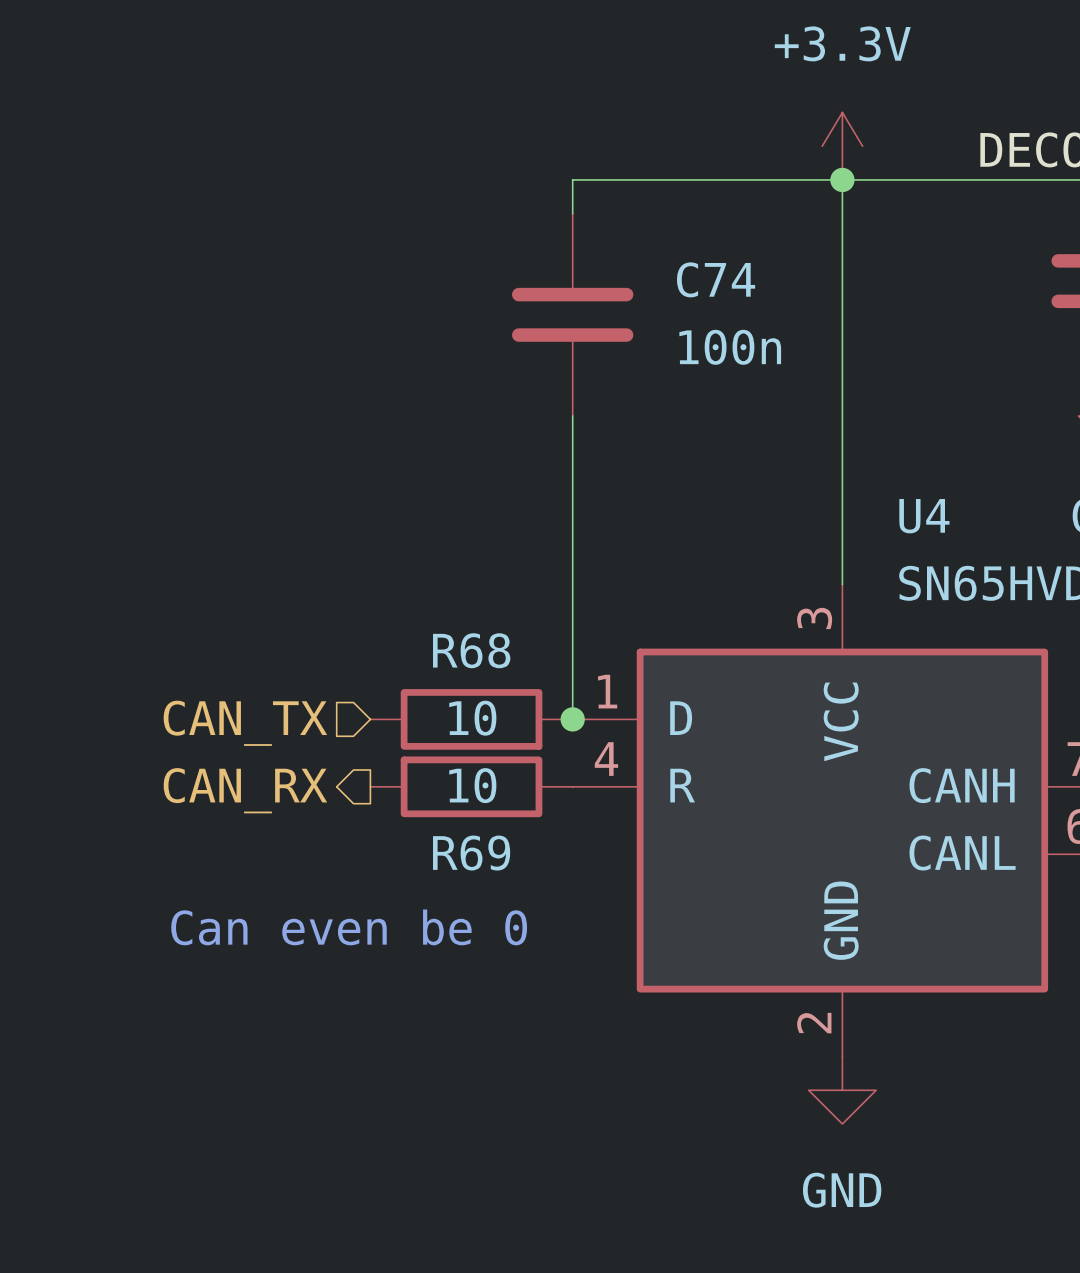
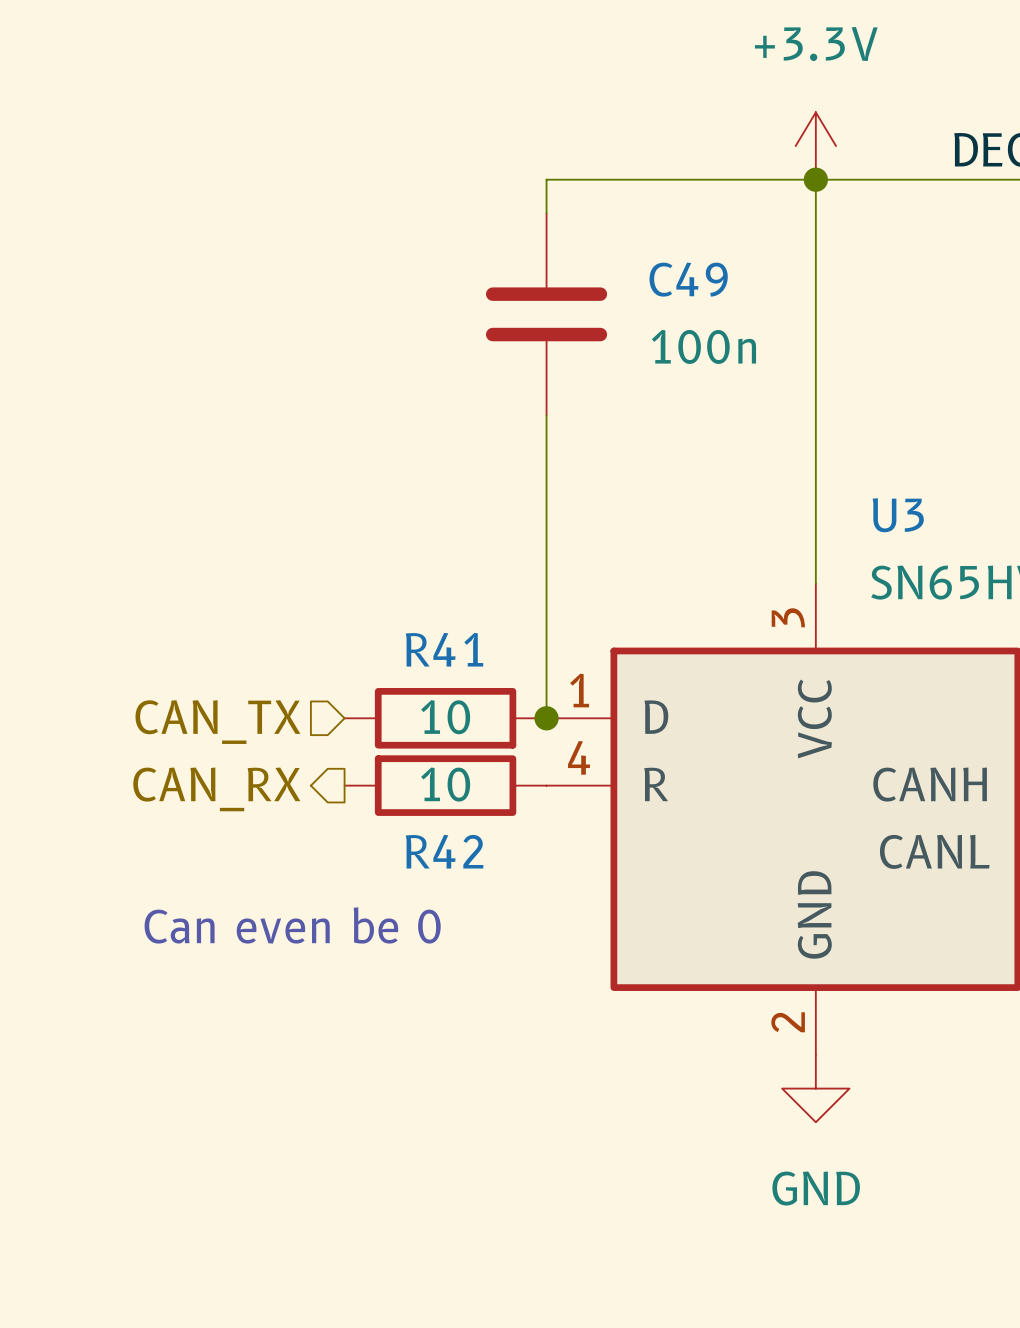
C74 name: C74 (716, 279) -> C49 (688, 279)
U4 name: U4 (924, 516) -> U3 (898, 515)
R68 name: R68 (471, 650) -> R41 (444, 649)
R69 name: R69 (471, 853) -> R42 (444, 851)

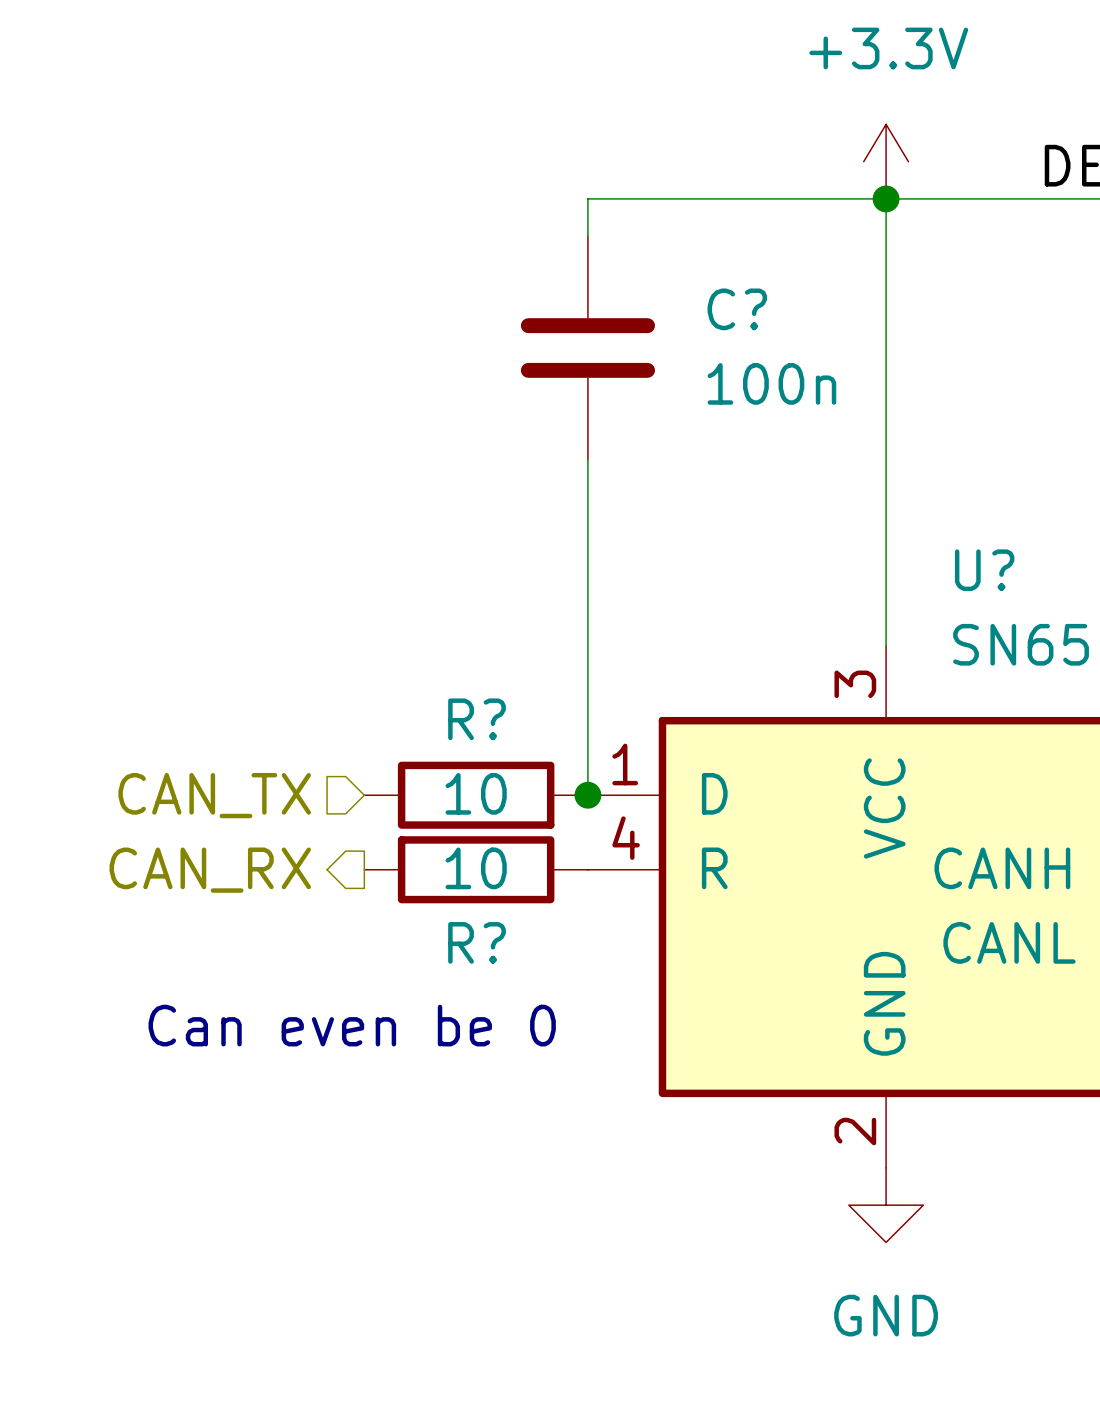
C49 name: C49 (688, 279) -> C? (737, 309)
U3 name: U3 (898, 515) -> U? (984, 570)
R41 name: R41 (444, 649) -> R? (477, 719)
R42 name: R42 (444, 851) -> R? (477, 942)

